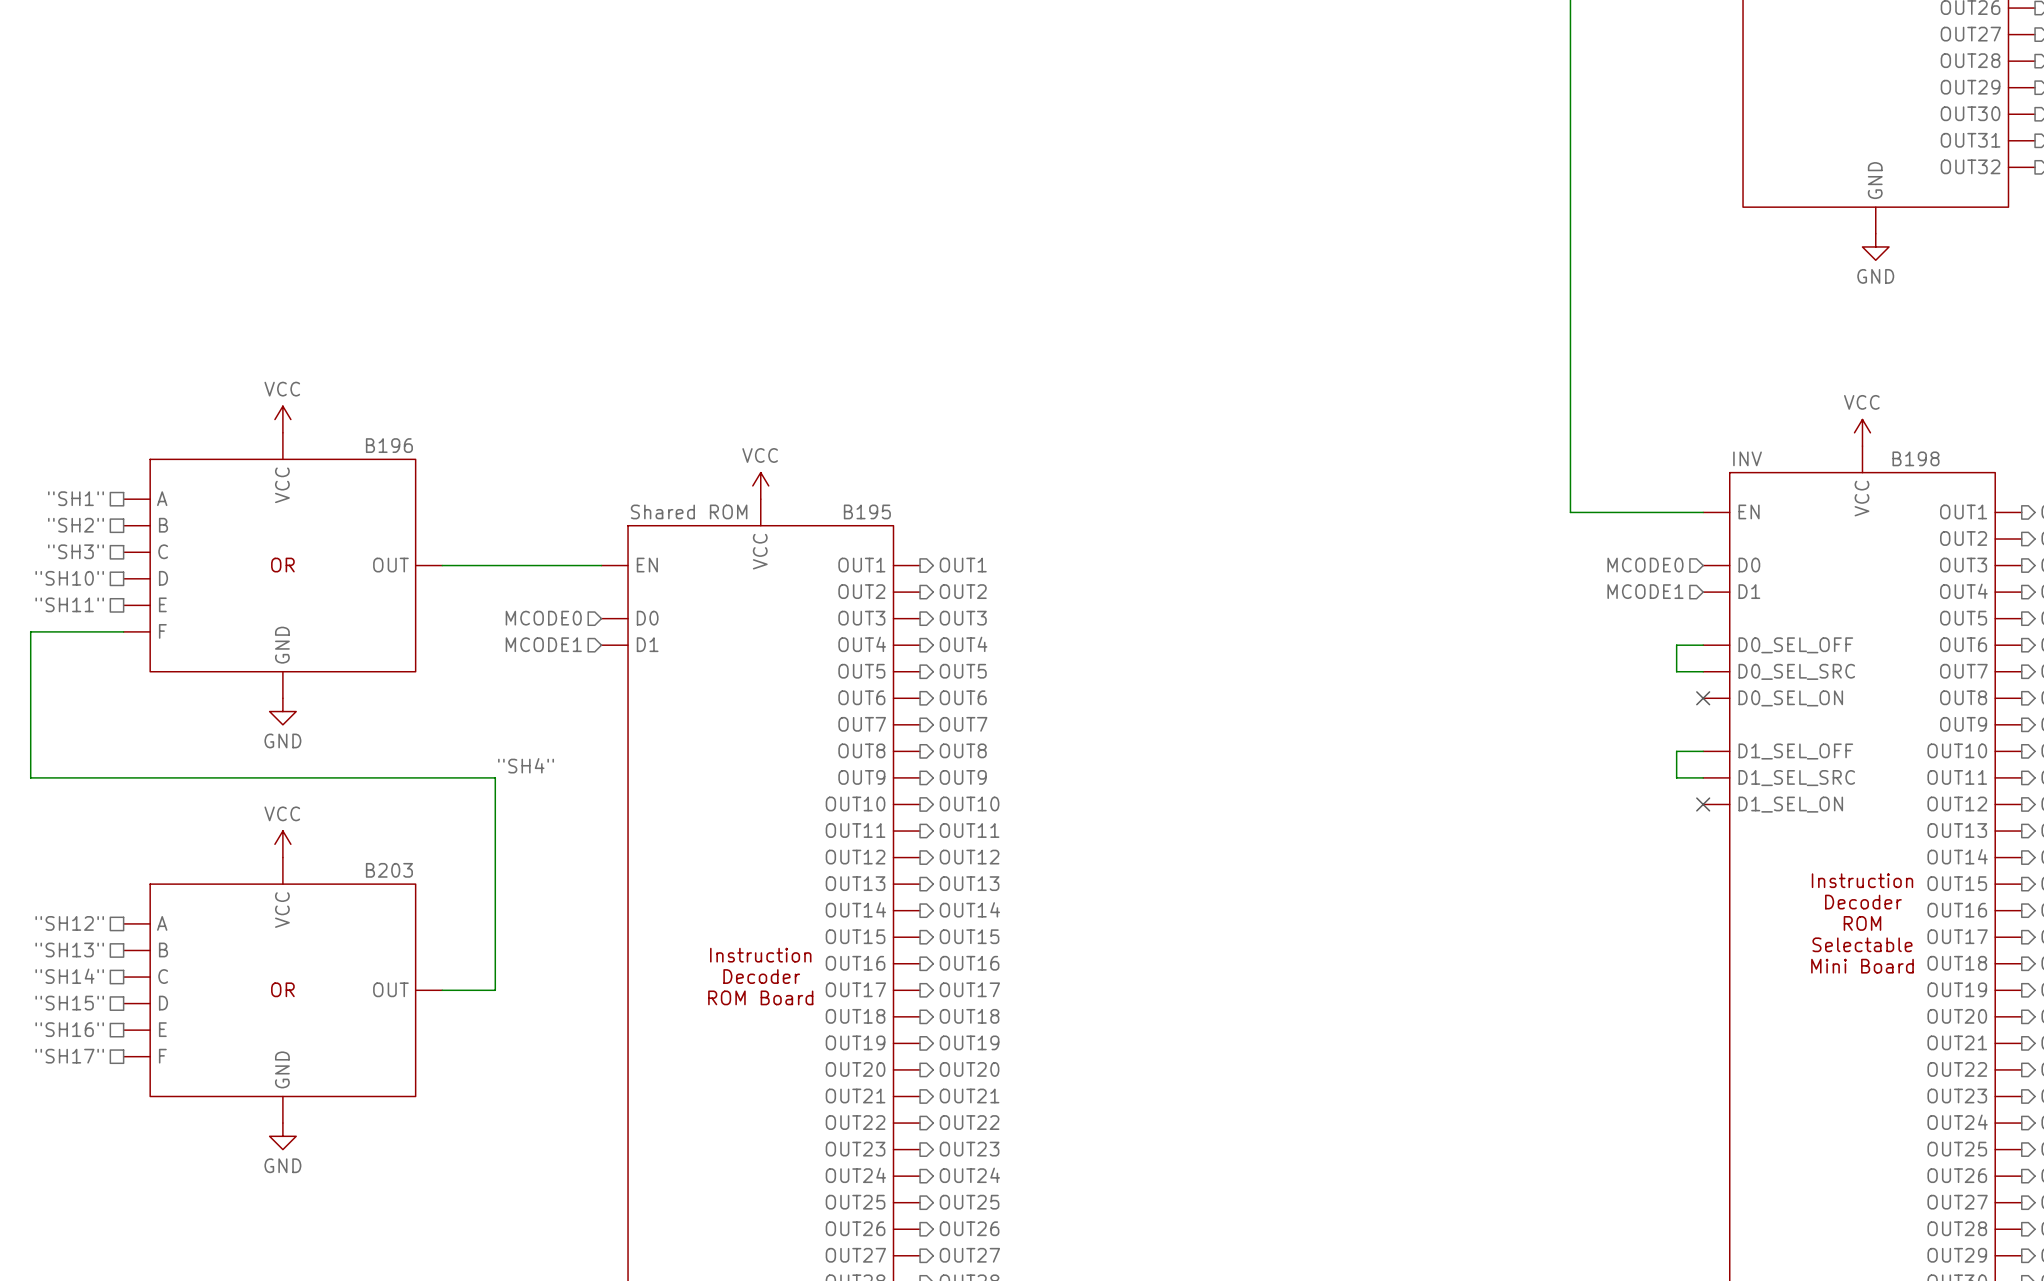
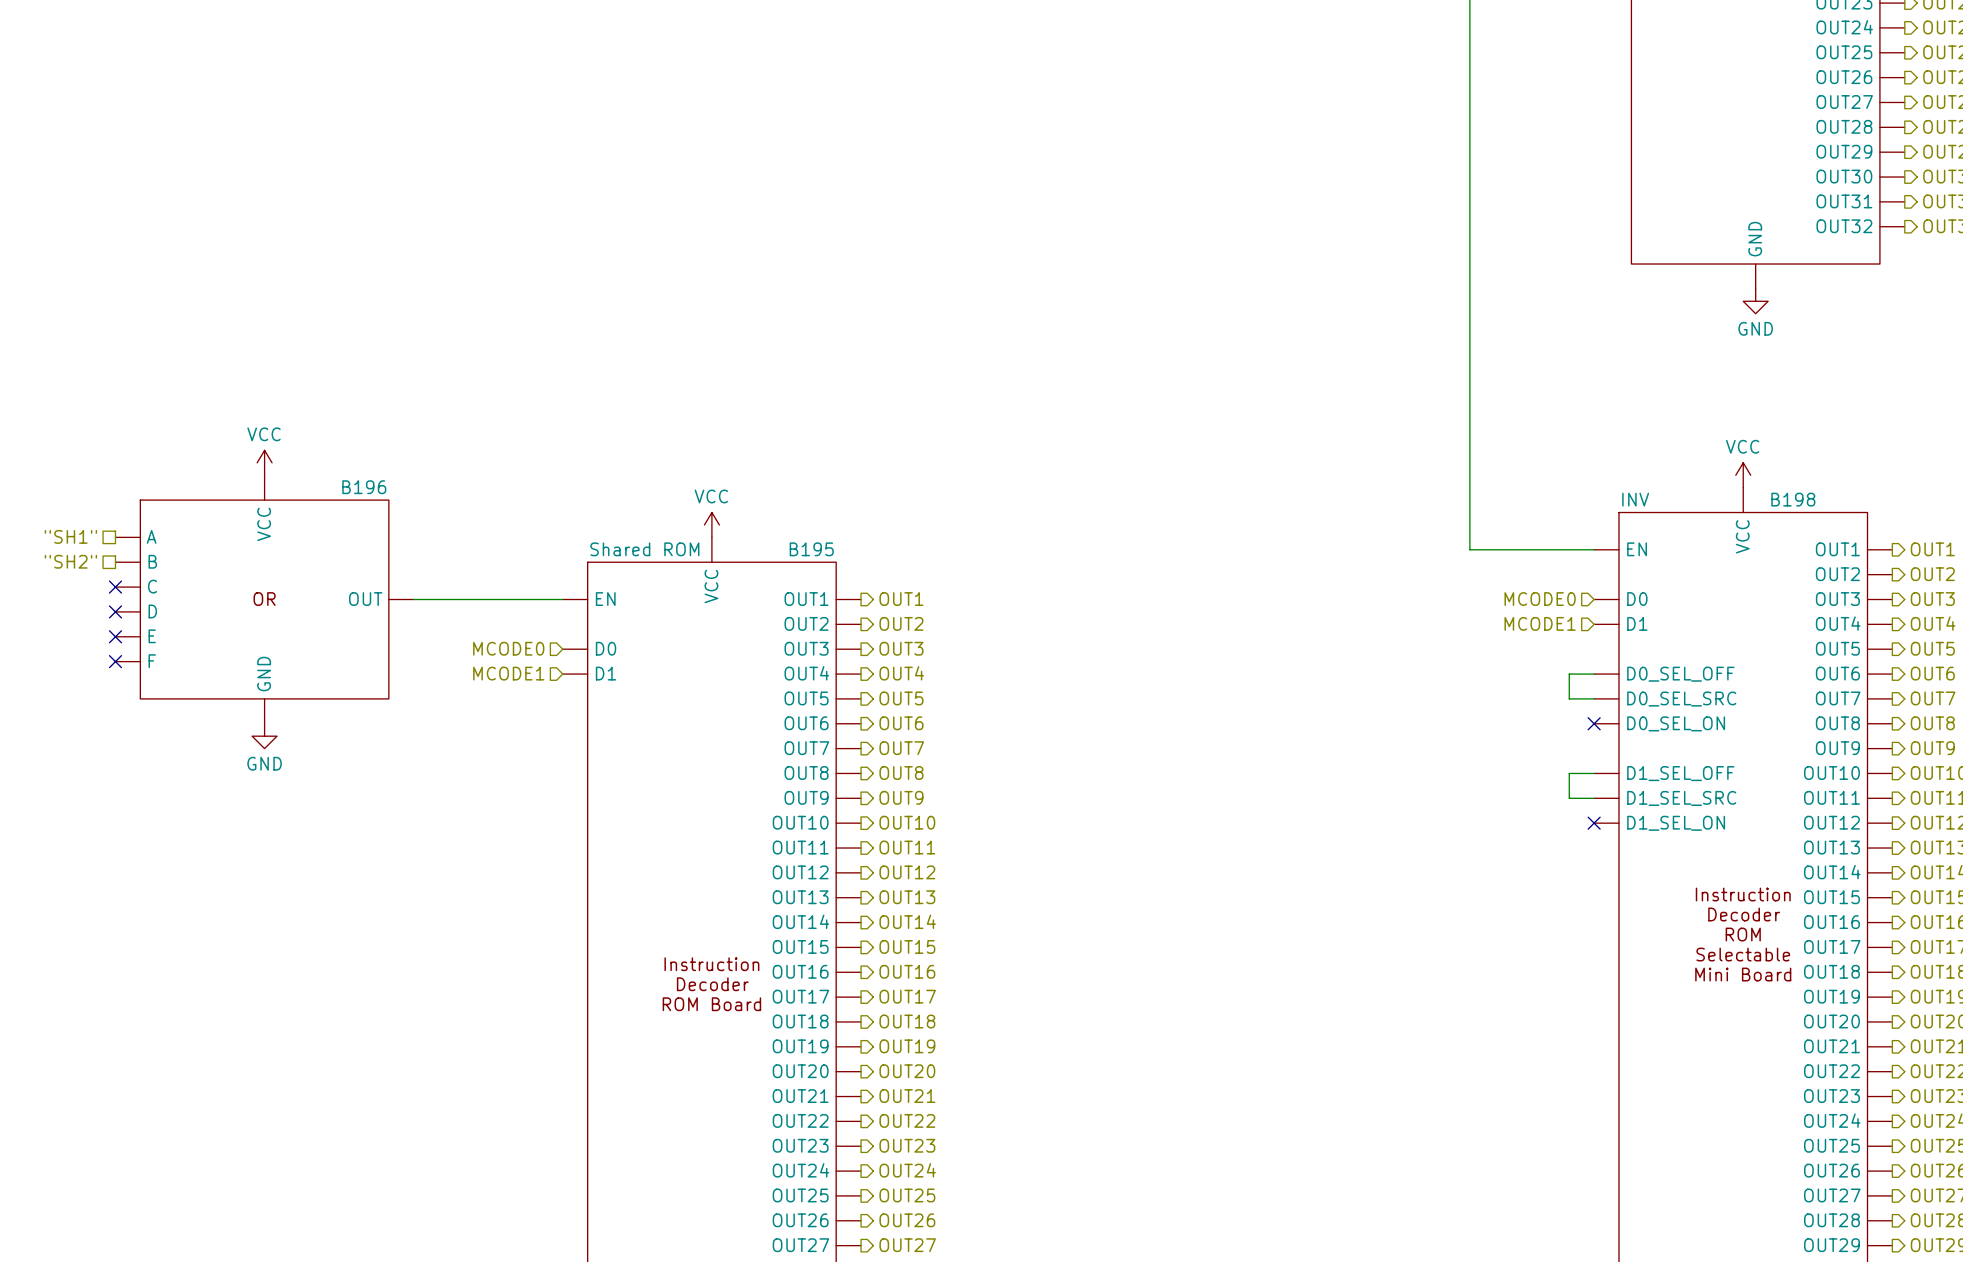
hierarchical label: "SH3" (76, 551) -> none
no-connect mark: none -> (115, 587)
hierarchical label: "SH10" (69, 578) -> none
no-connect mark: none -> (115, 611)
hierarchical label: "SH11" (69, 604) -> none
no-connect mark: none -> (115, 636)
wire: (123, 631) (30, 631) (30, 777) (495, 777) (495, 990) (442, 990) -> none
no-connect mark: none -> (115, 661)
label: "SH4" (526, 765) -> none
power symbol: VCC (282, 844) -> none
hierarchical label: "SH12" (69, 923) -> none
hierarchical label: "SH13" (69, 949) -> none
hierarchical label: "SH14" (69, 976) -> none
B203: (282, 990) -> none
hierarchical label: "SH15" (69, 1003) -> none
hierarchical label: "SH16" (69, 1029) -> none
hierarchical label: "SH17" (69, 1056) -> none
power symbol: GND (282, 1136) -> none

